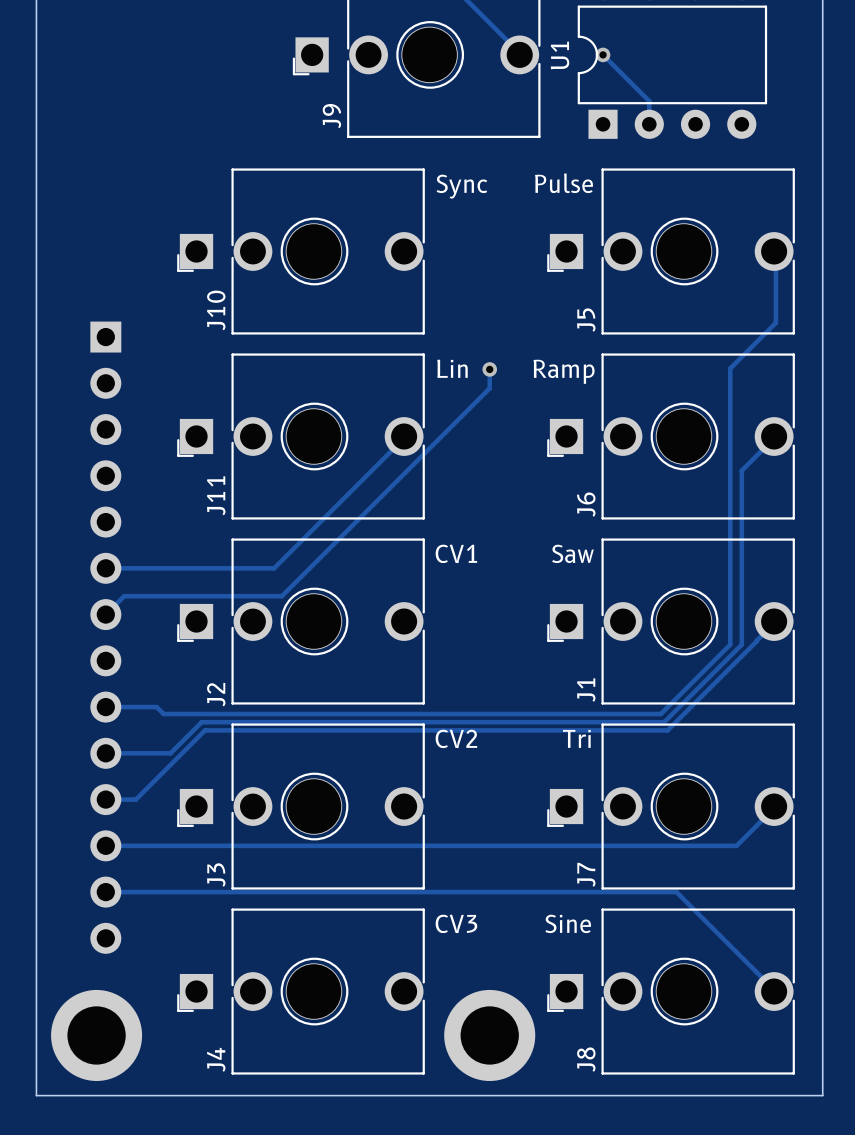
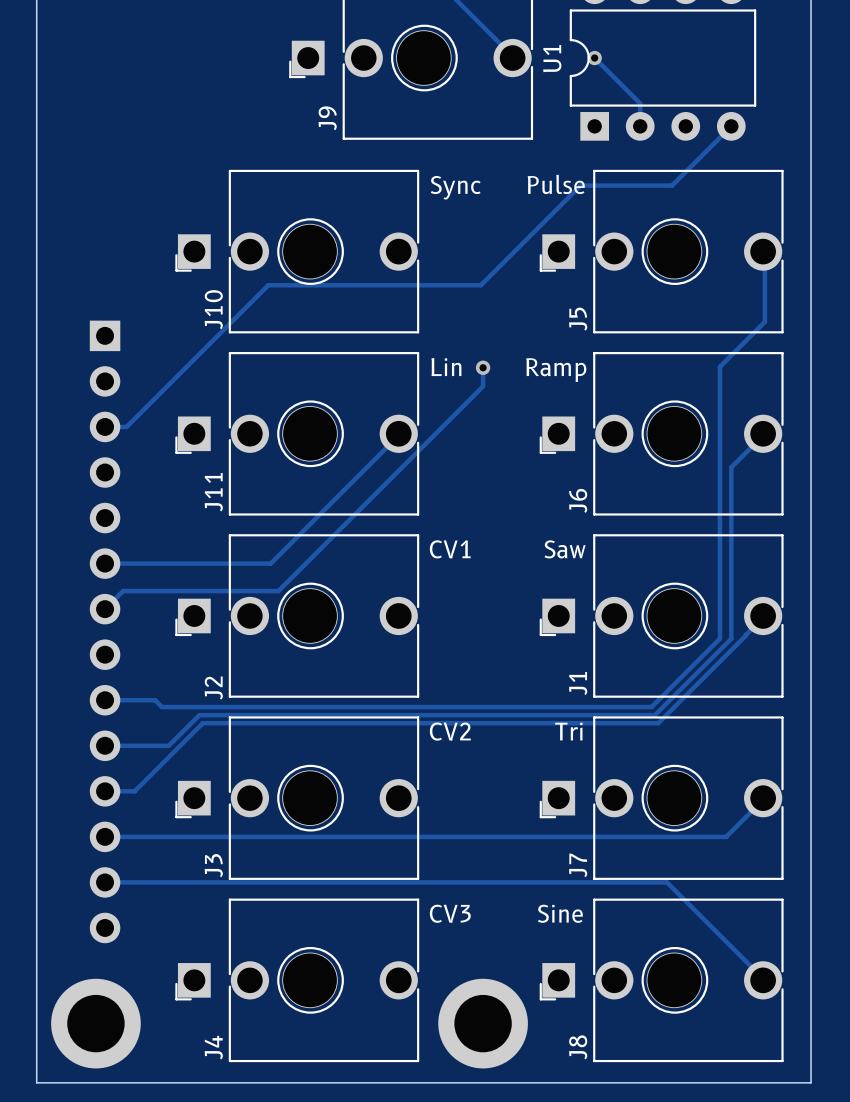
track: none -> (731, 126) (672, 185) (580, 185) (480, 285) (268, 285) (126, 426) (105, 426)

